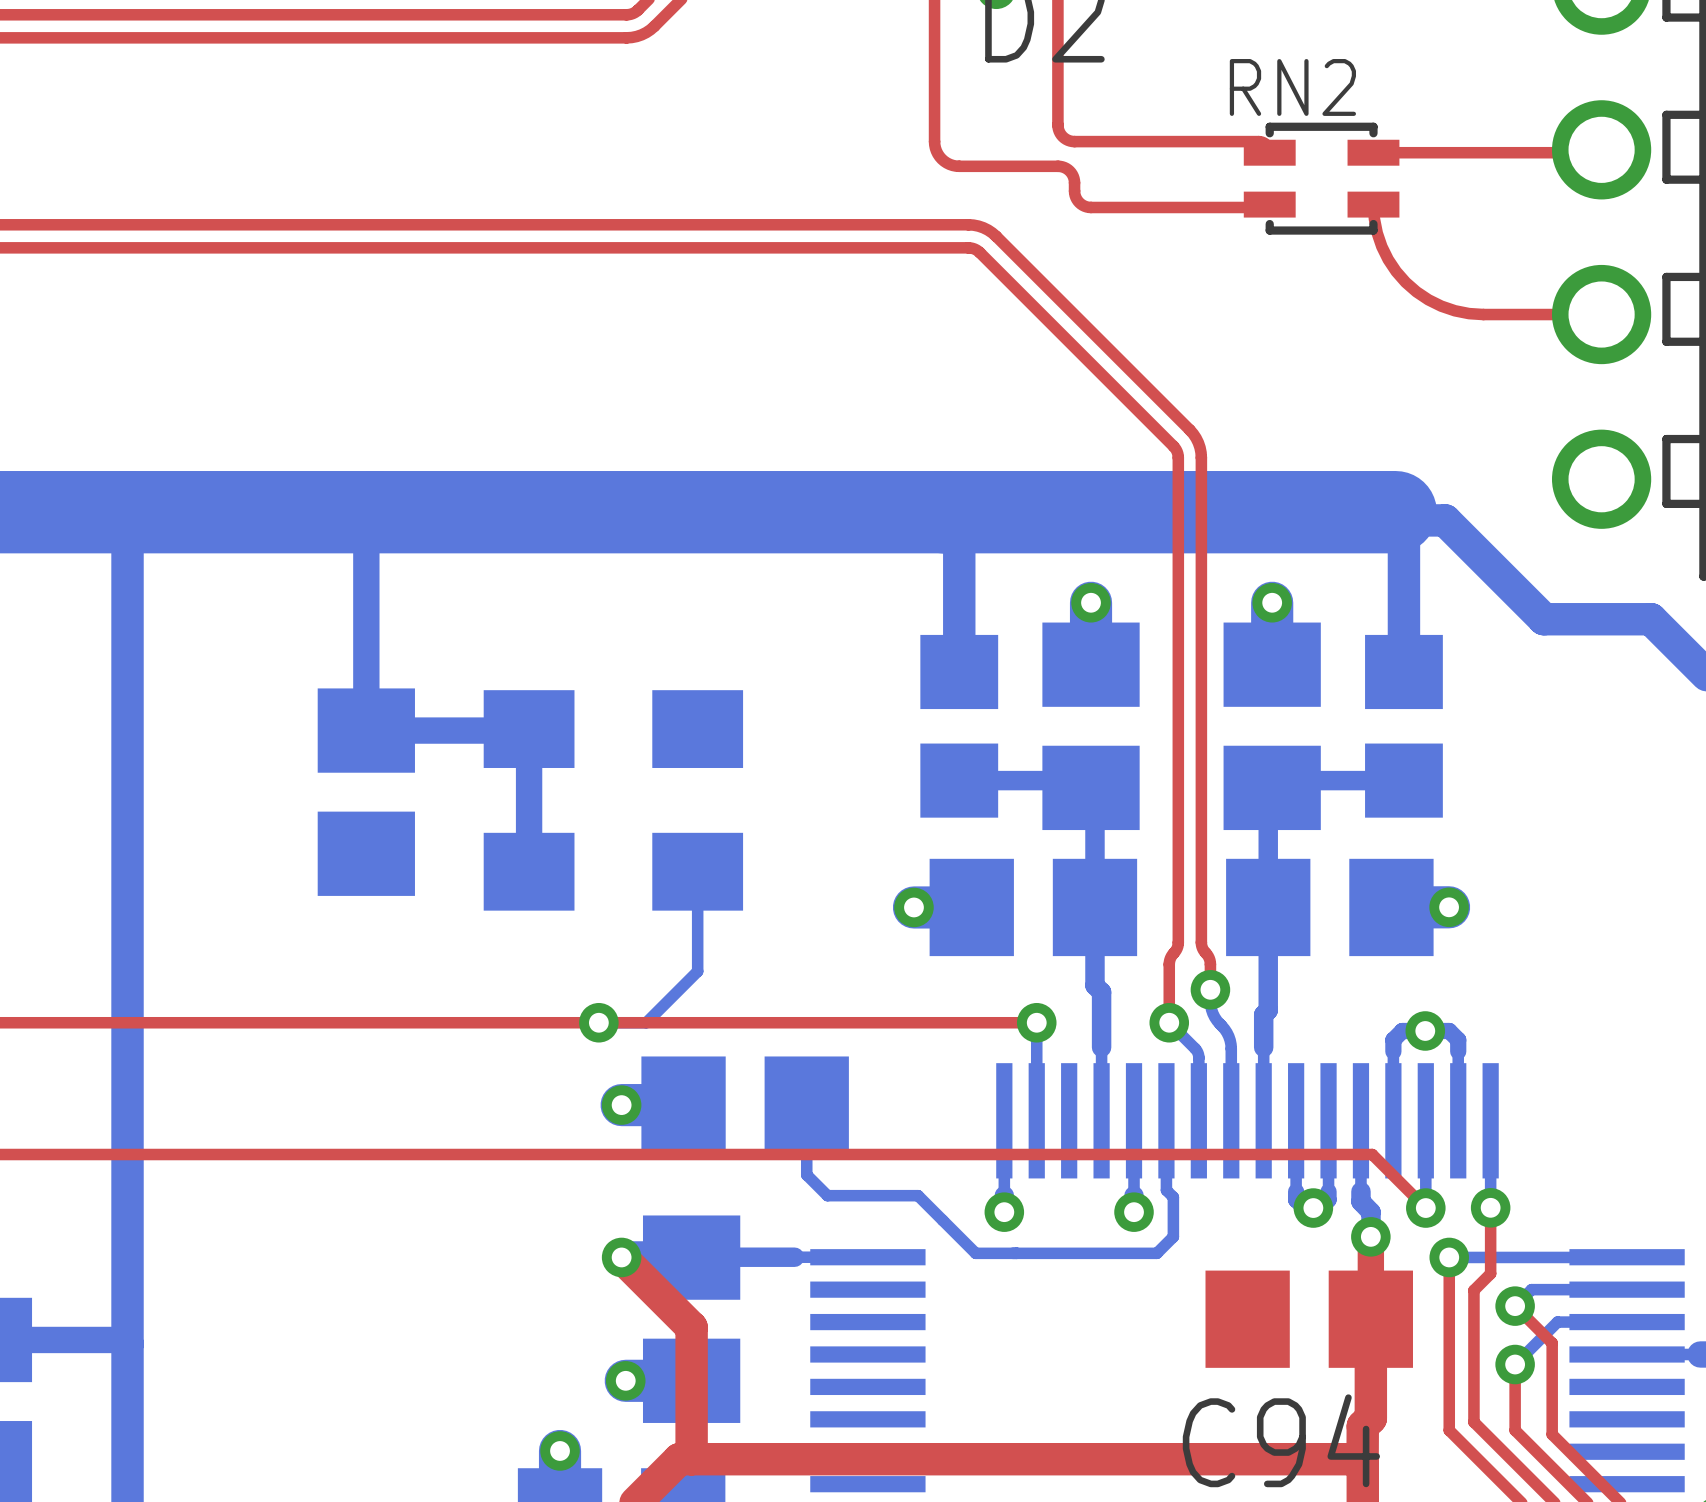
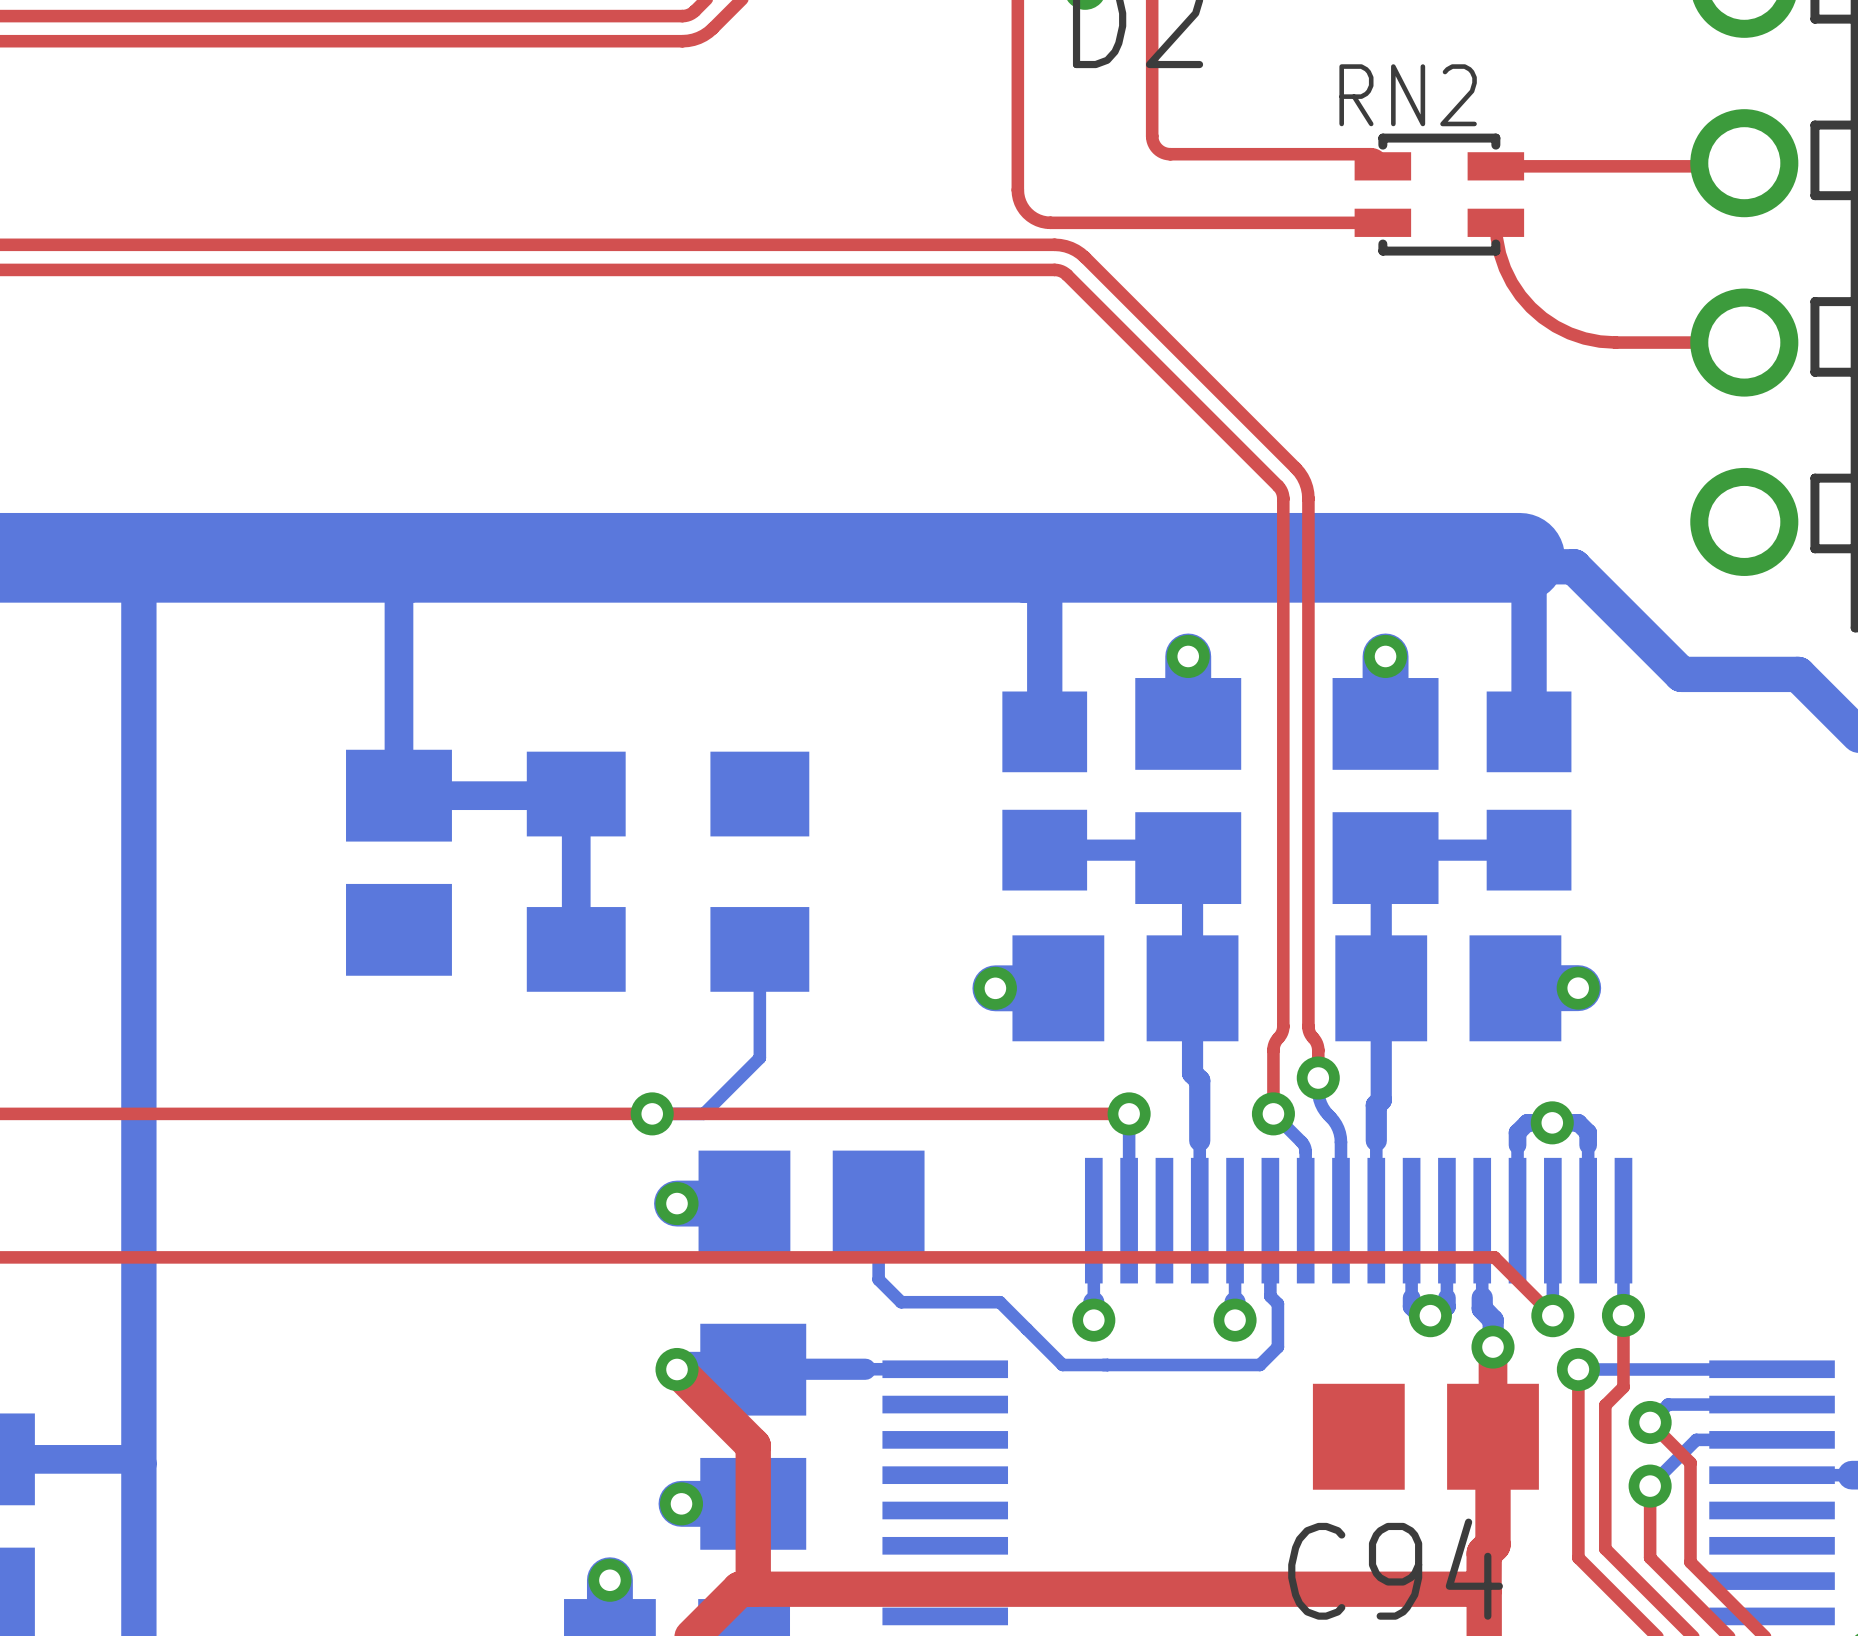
top track: (934, 141) (939, 156) (952, 165) (1064, 167) (1073, 176) (1076, 199) (1082, 205) (1088, 207) (1266, 207) (1269, 204) -> (1017, 154) (1017, 190) (1020, 202) (1030, 216) (1046, 222) (1382, 222)

